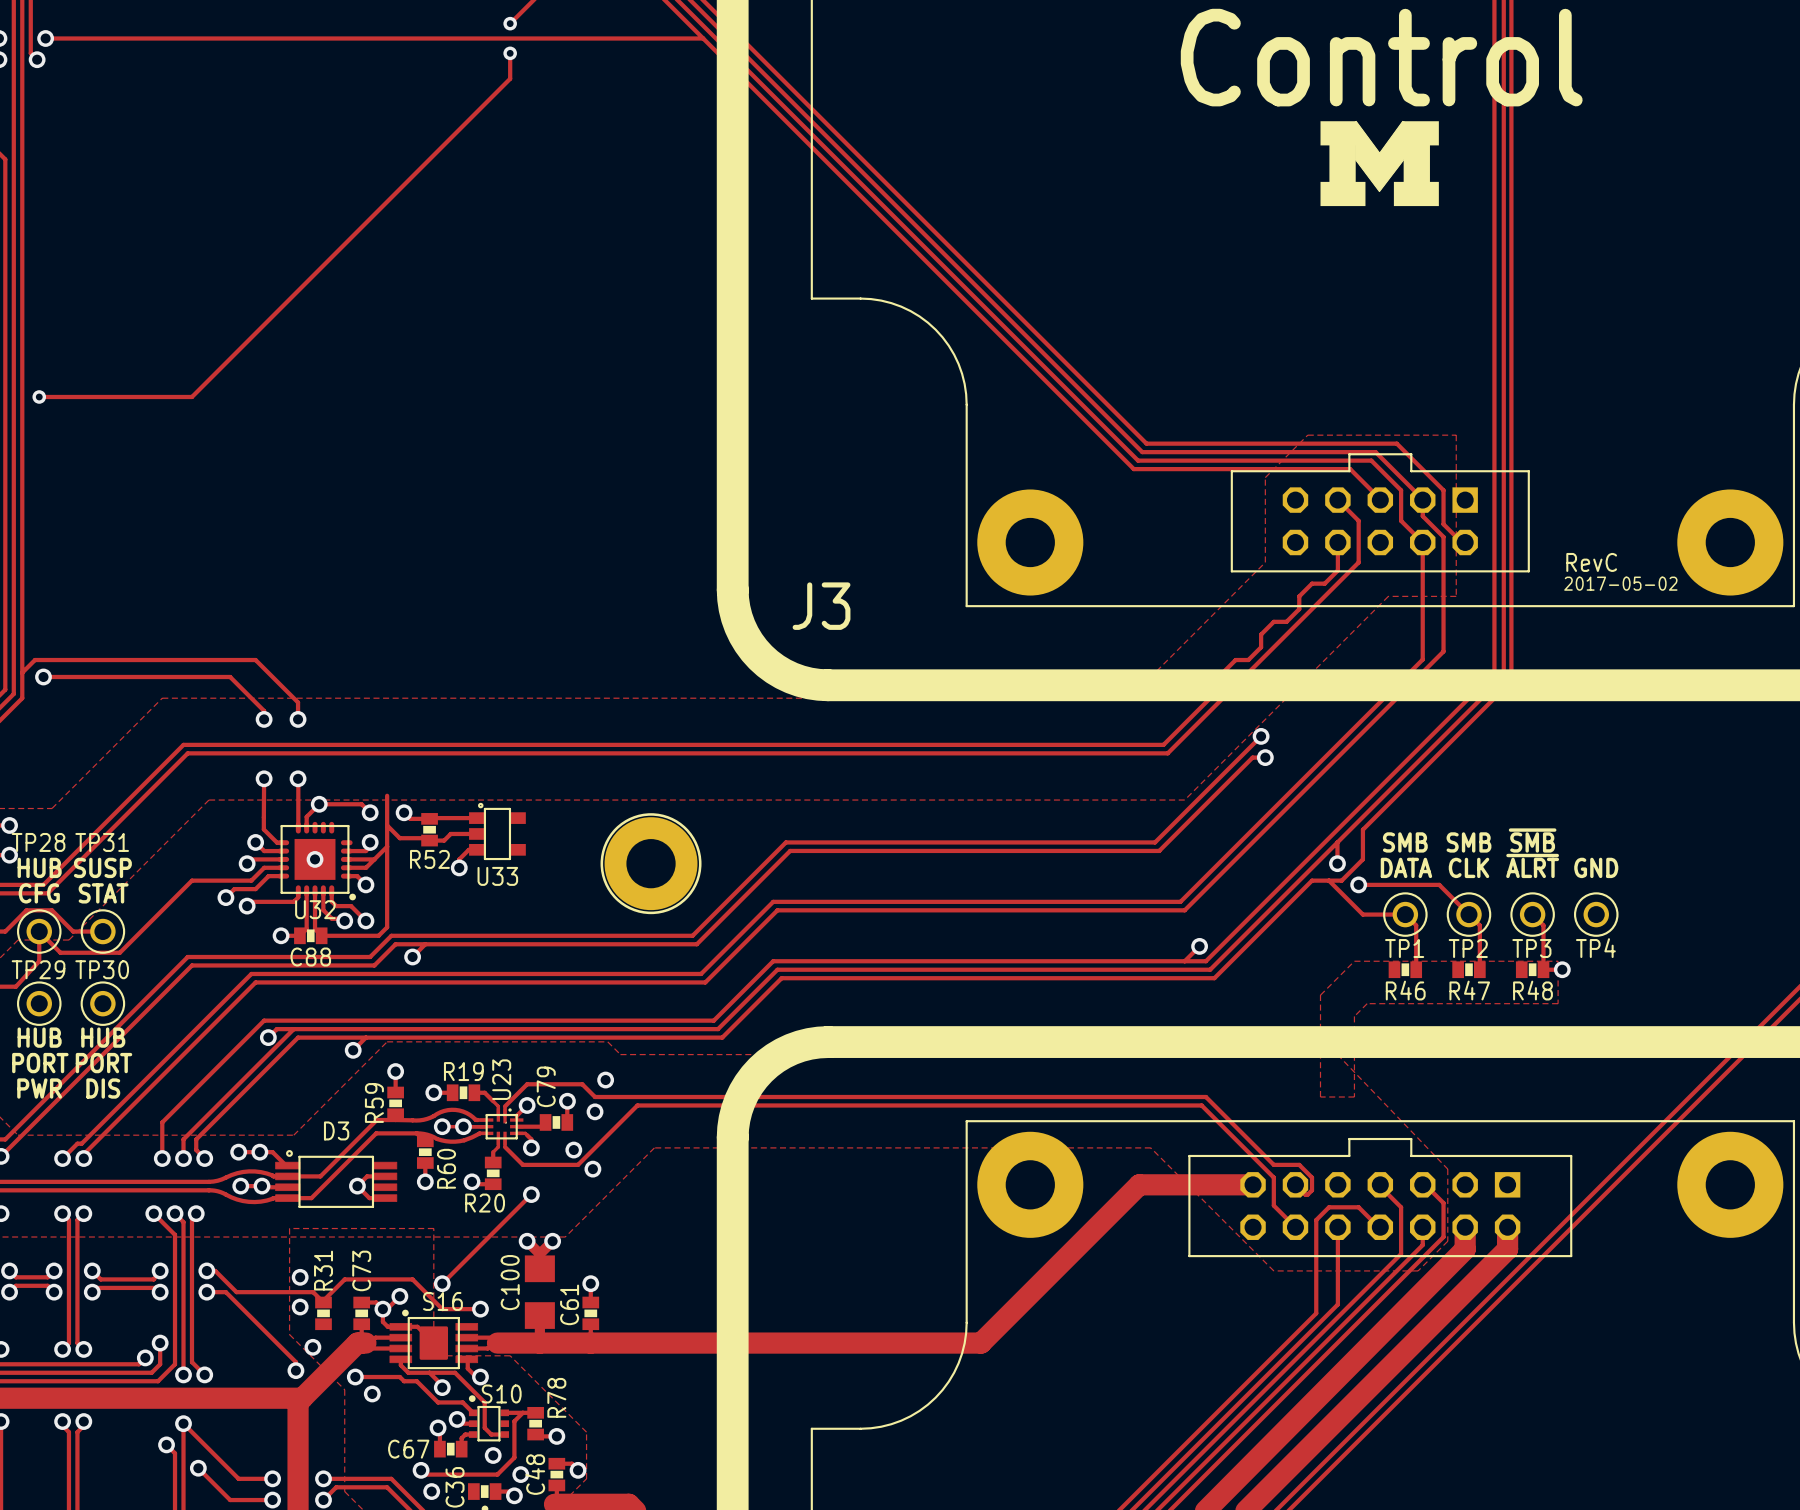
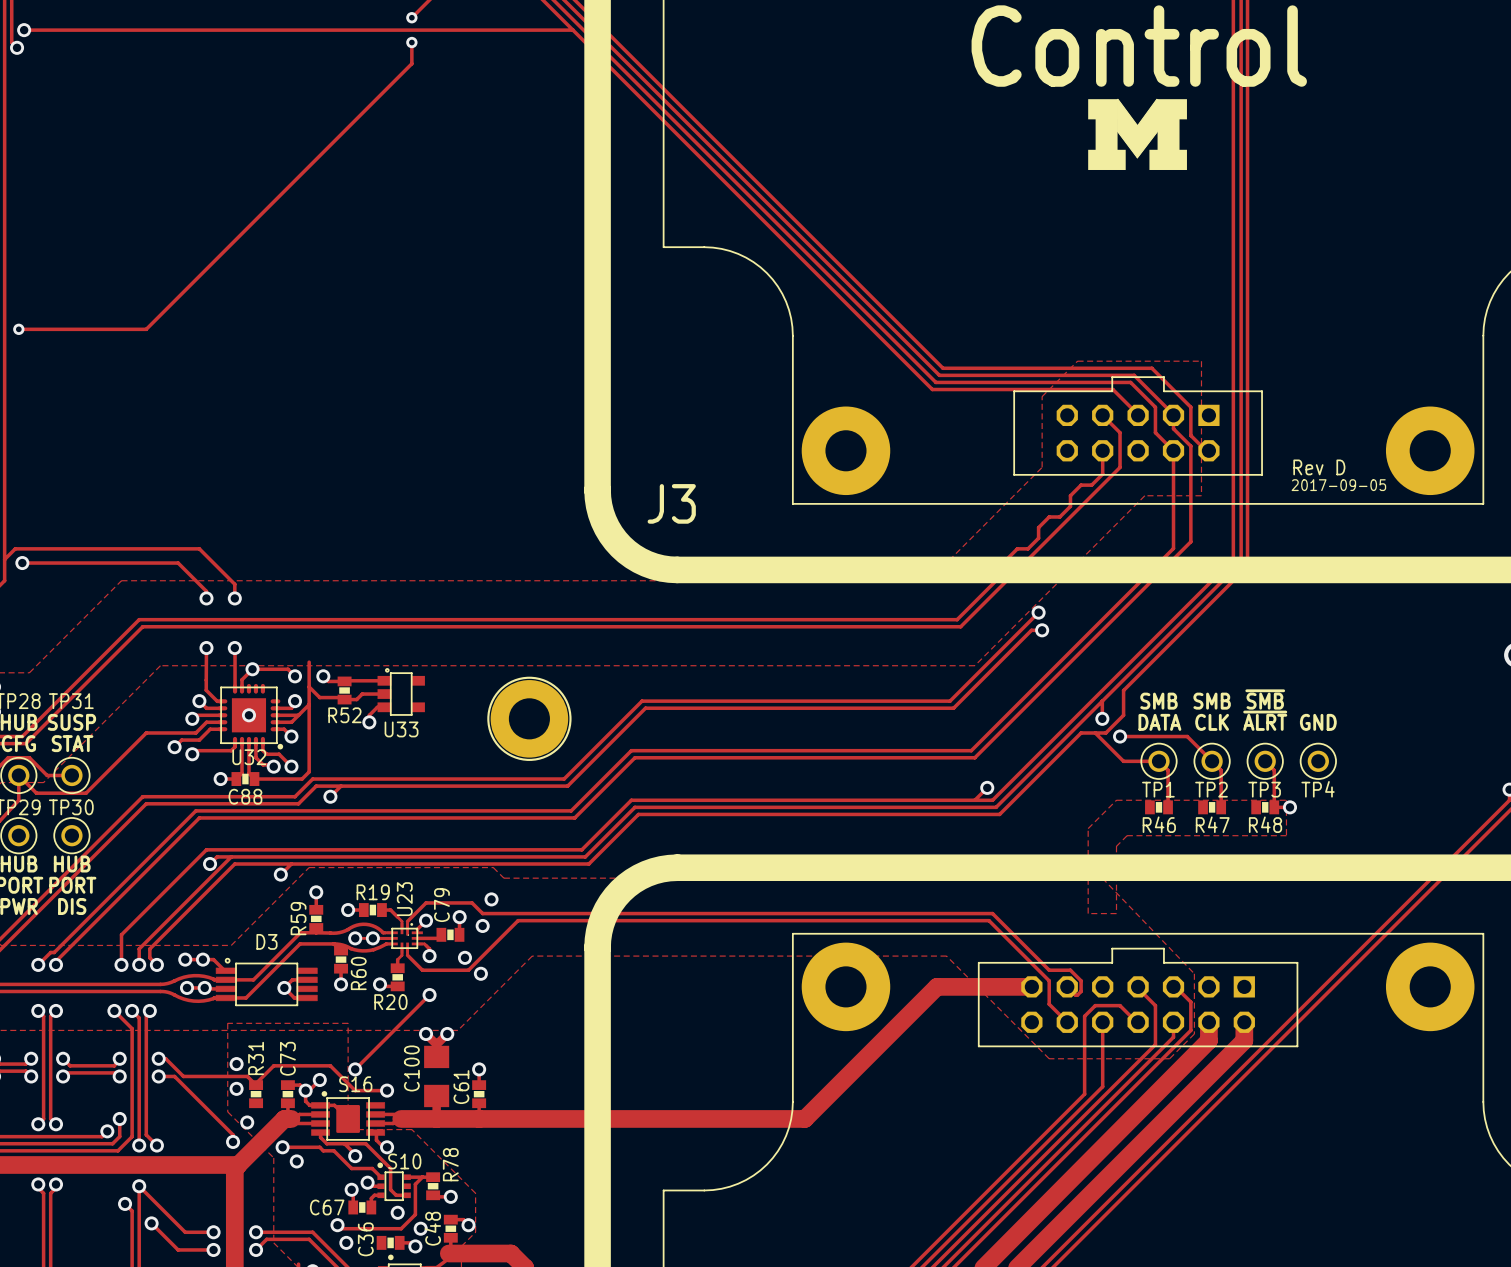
text: RevC (1591, 562) -> Rev D (1319, 467)
text: 2017-05-02 (1620, 583) -> 2017-09-05 (1338, 485)

